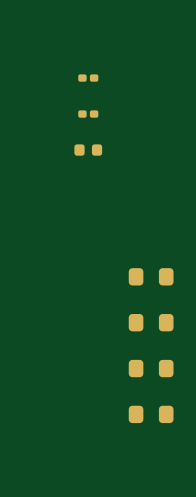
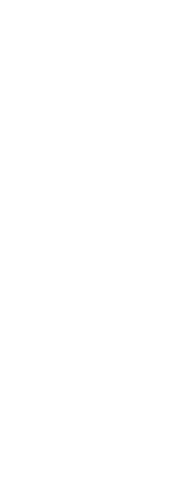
part: (88, 78) -> none
part: (88, 114) -> none
part: (88, 150) -> none
part: (151, 276) -> none
part: (151, 322) -> none
part: (151, 368) -> none
part: (151, 414) -> none

